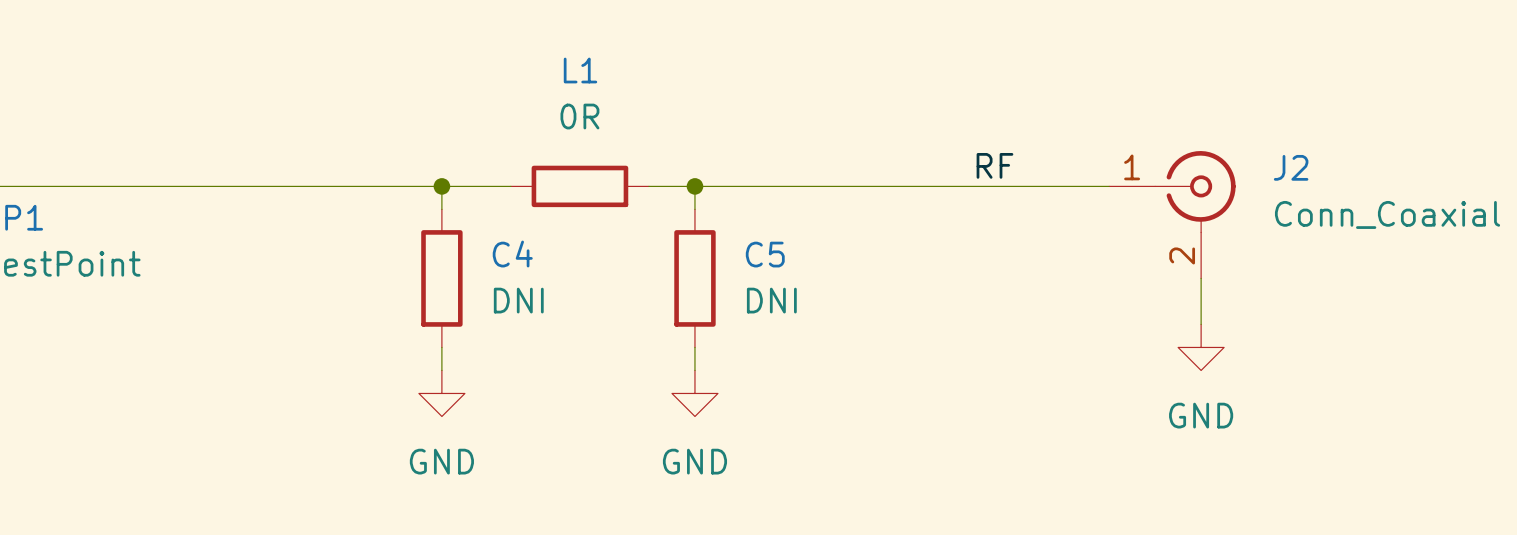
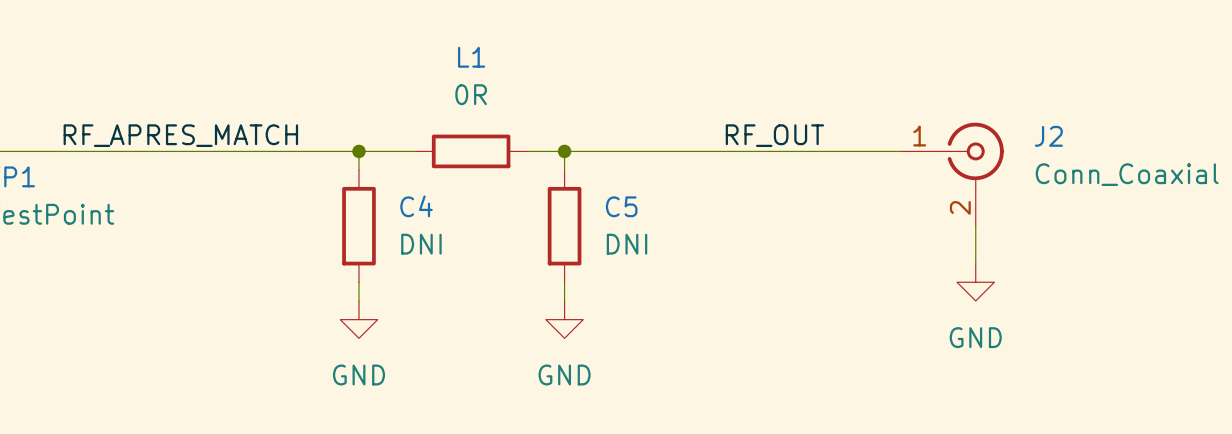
label: RF (994, 165) -> RF_OUT (774, 135)
label: none -> RF_APRES_MATCH (180, 135)

